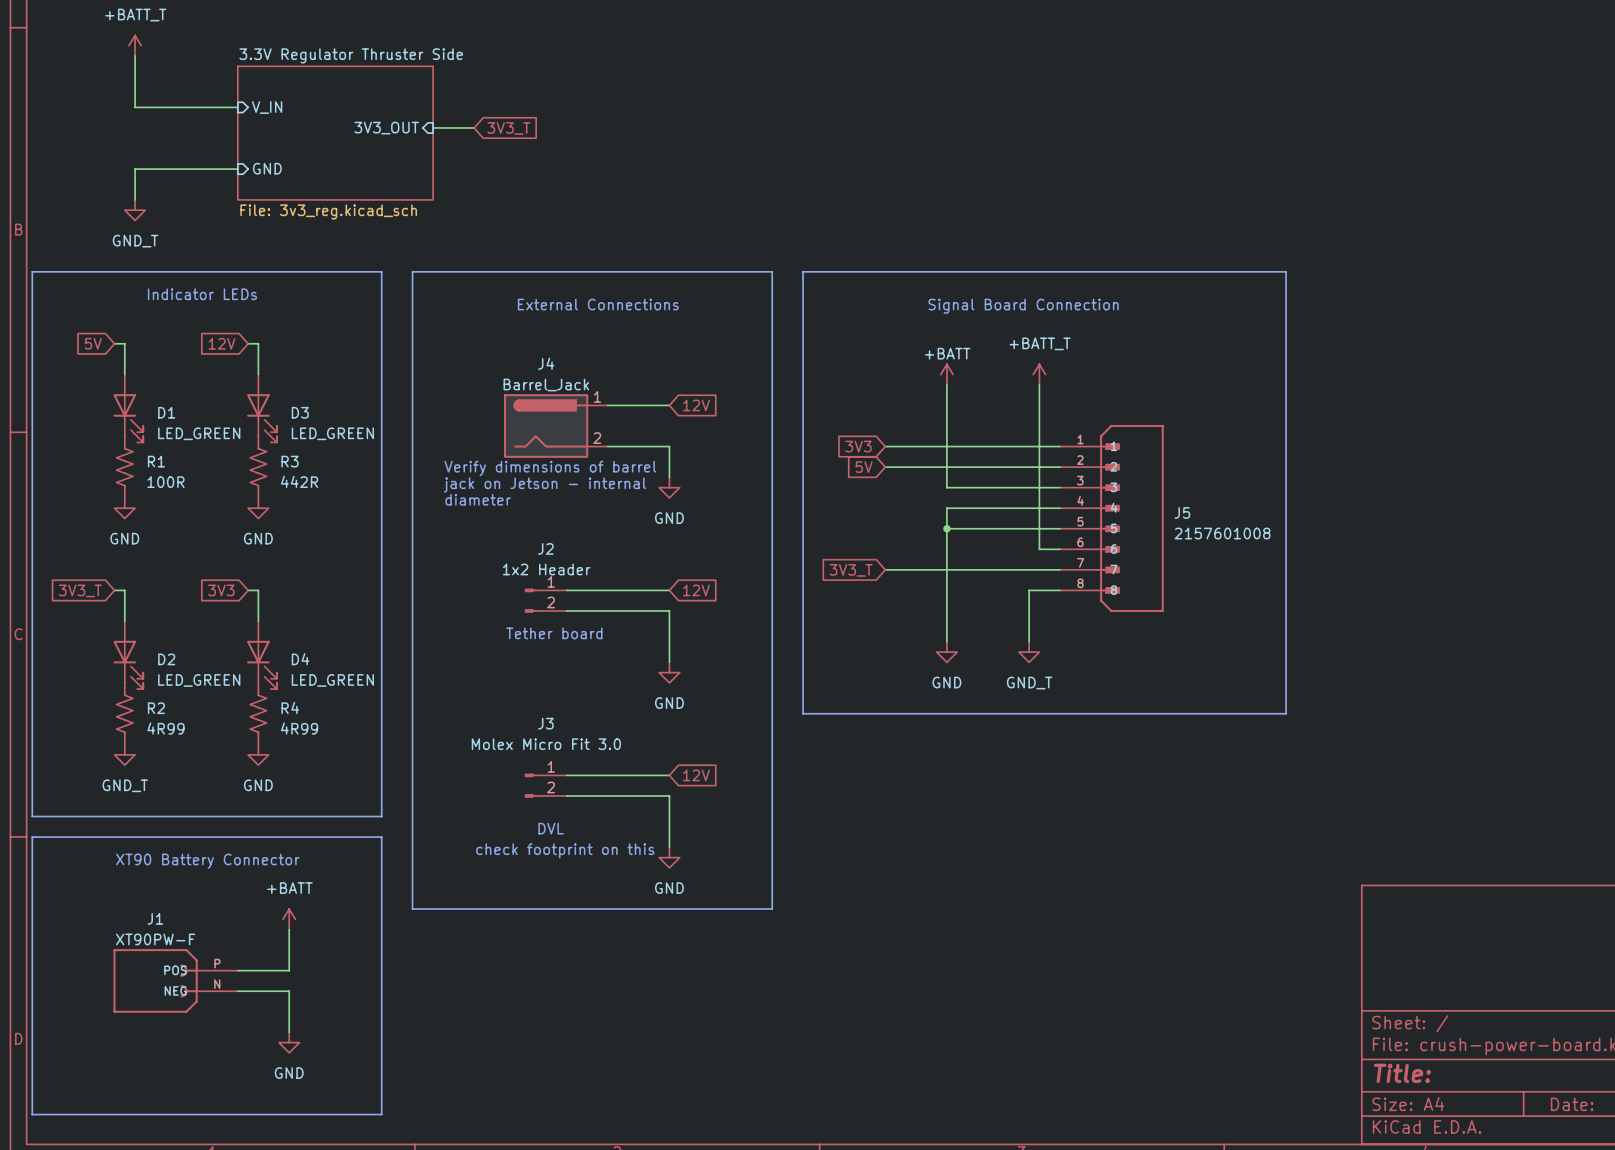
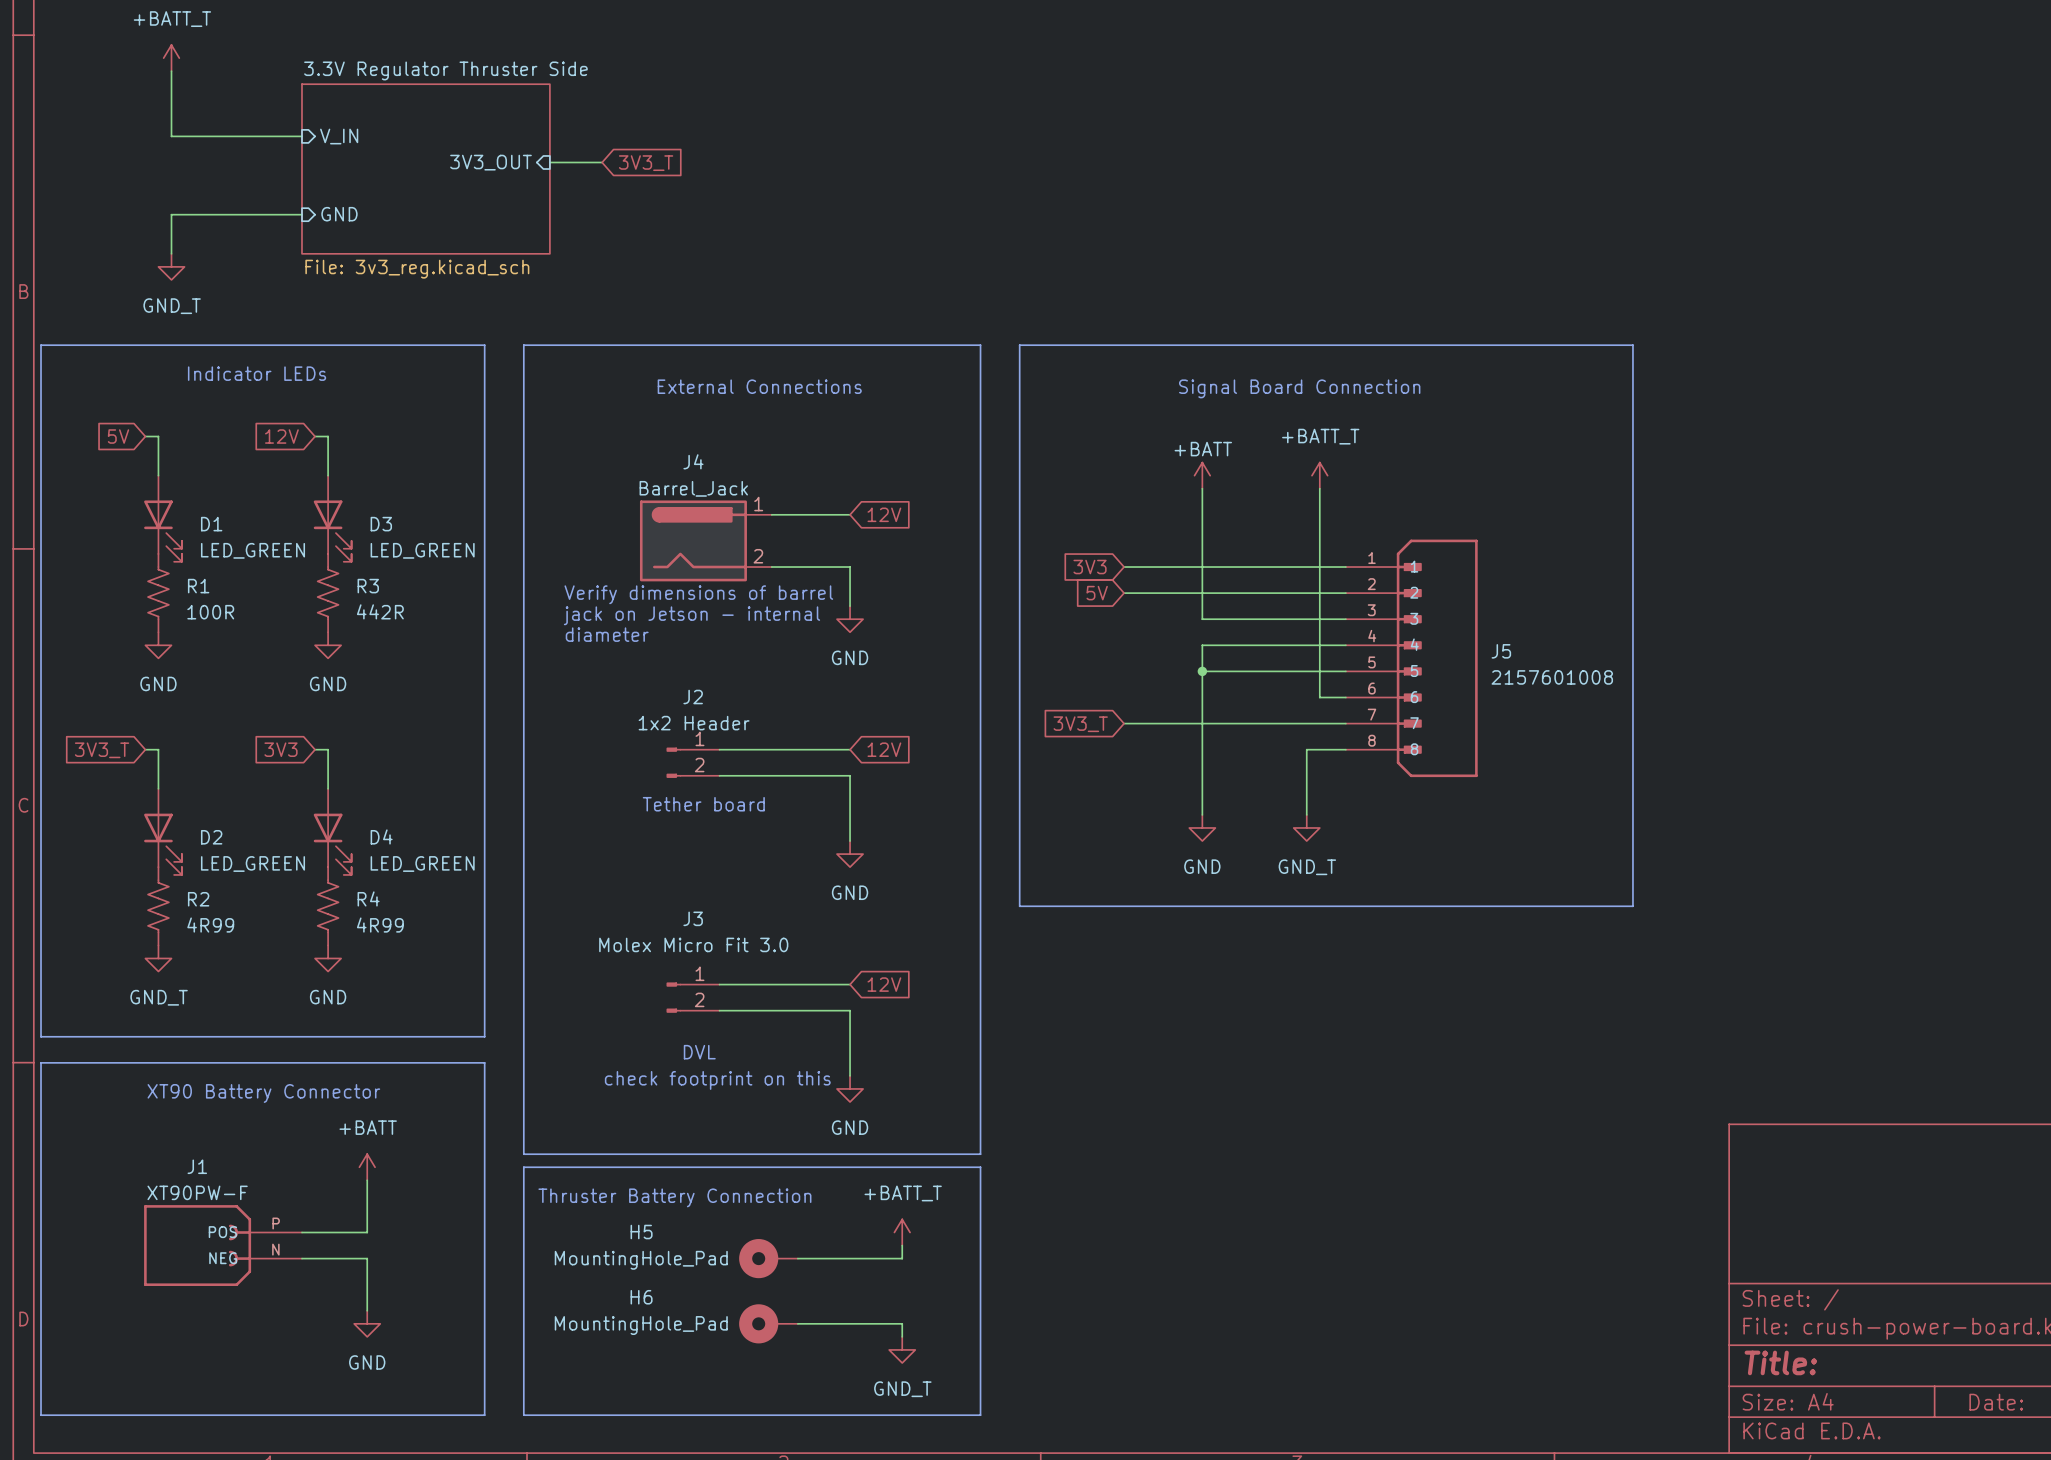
line: none -> (523, 1167) (980, 1167) (980, 1415) (523, 1415) (523, 1167)
text: none -> Thruster Battery Connection (674, 1197)
power symbol: none -> +BATT_T (902, 1232)
wire: none -> (902, 1245) (902, 1258) (797, 1258)
H5: none -> MountingHole_Pad (768, 1258)
H6: none -> MountingHole_Pad (768, 1323)
wire: none -> (797, 1323) (902, 1323) (902, 1336)
power symbol: none -> GND_T (902, 1349)

